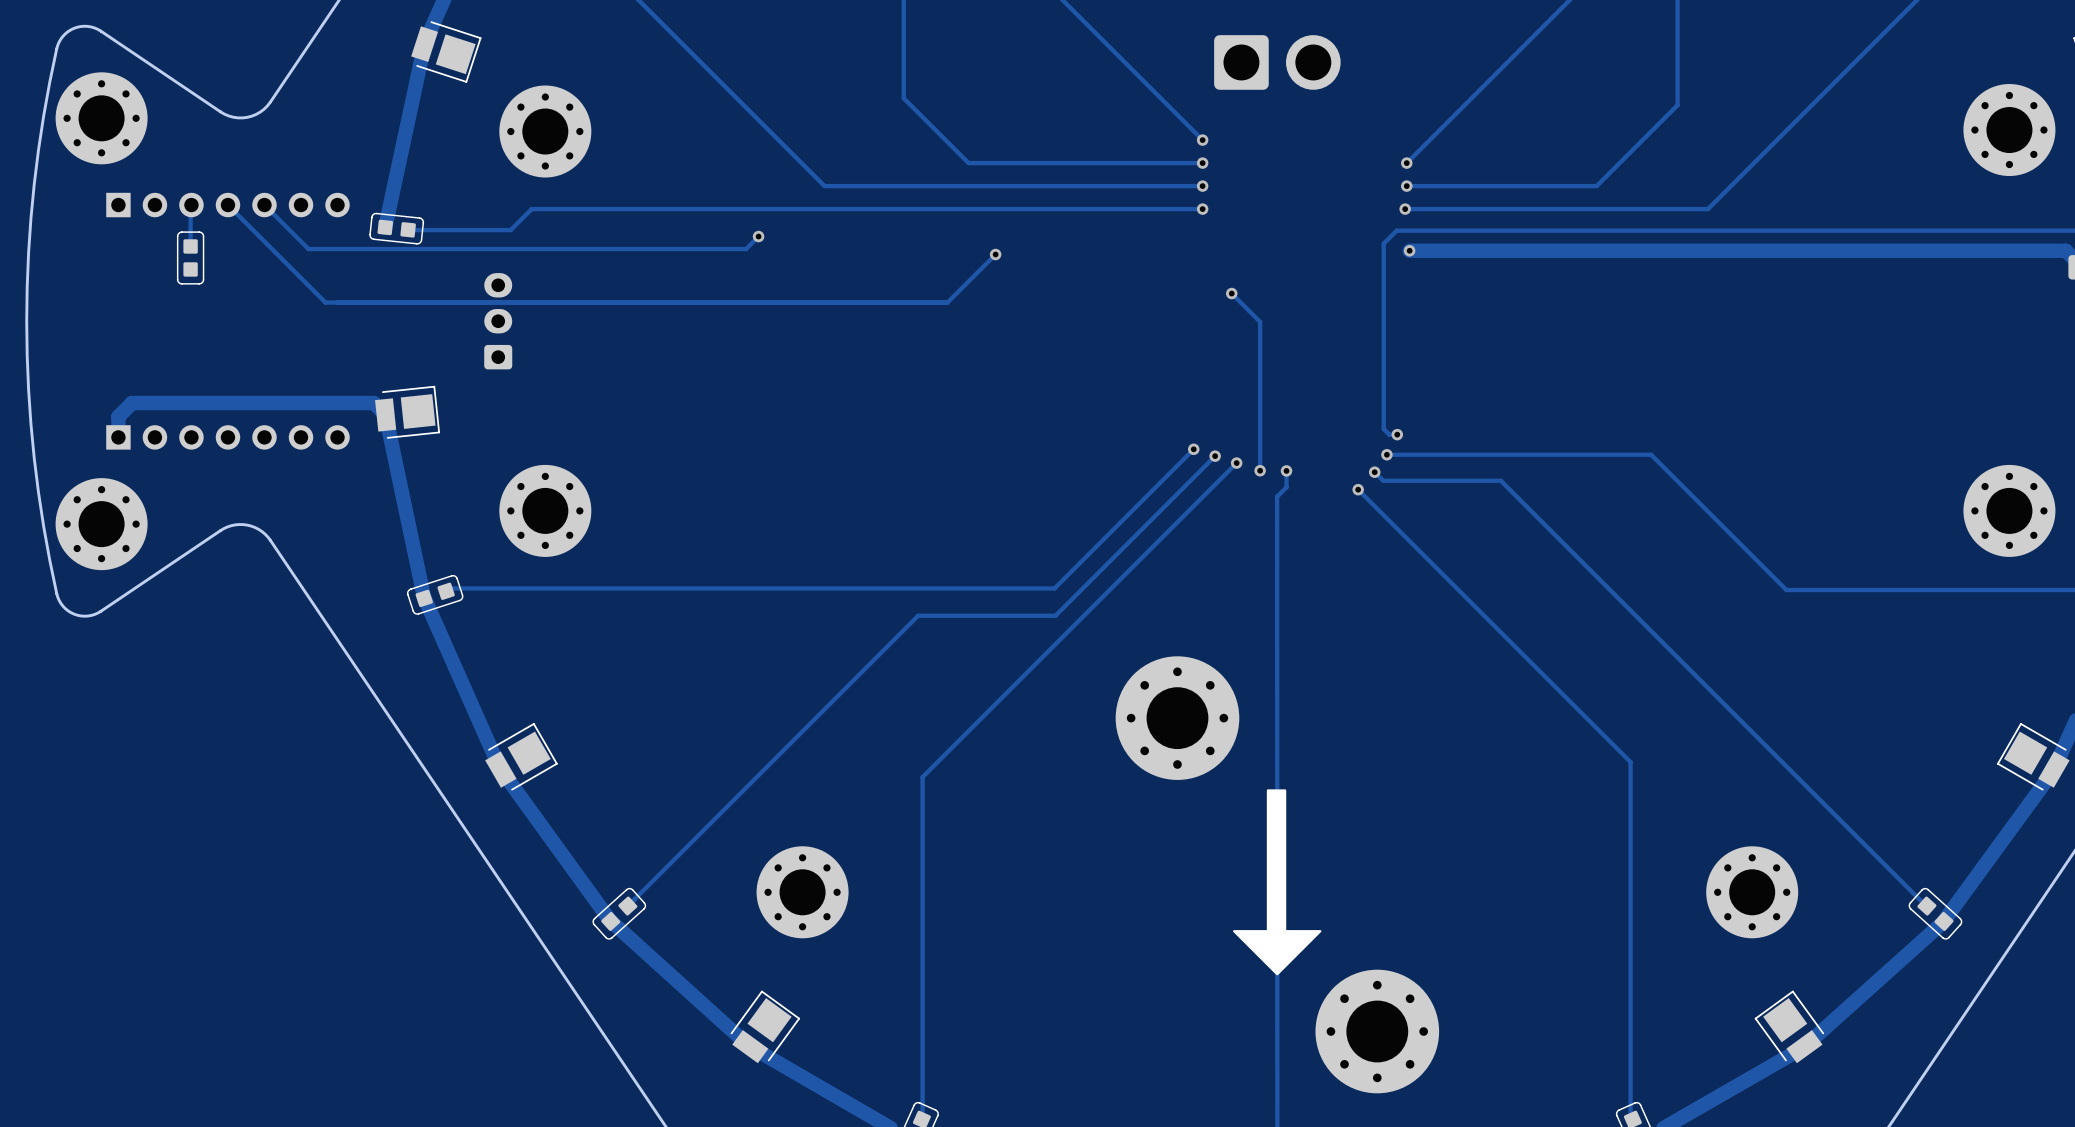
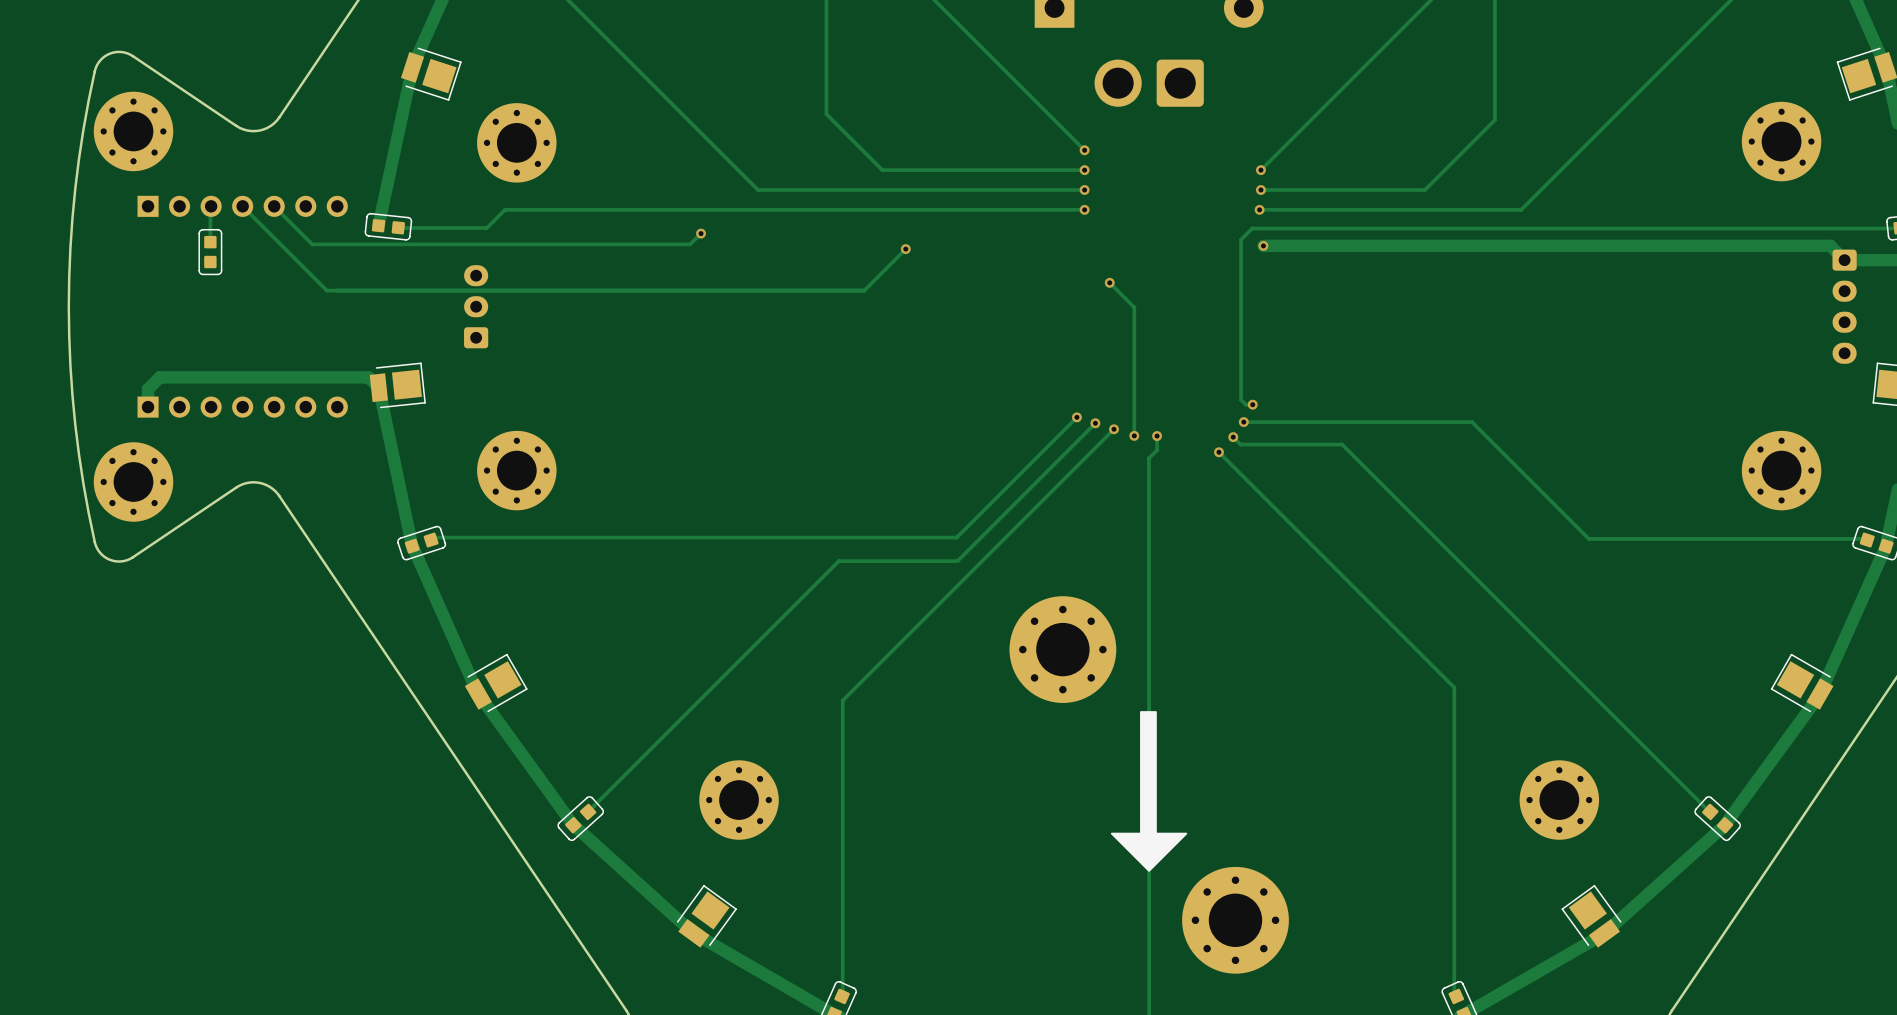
part rotation: 0° (1277, 62) -> 180° (1149, 83)

